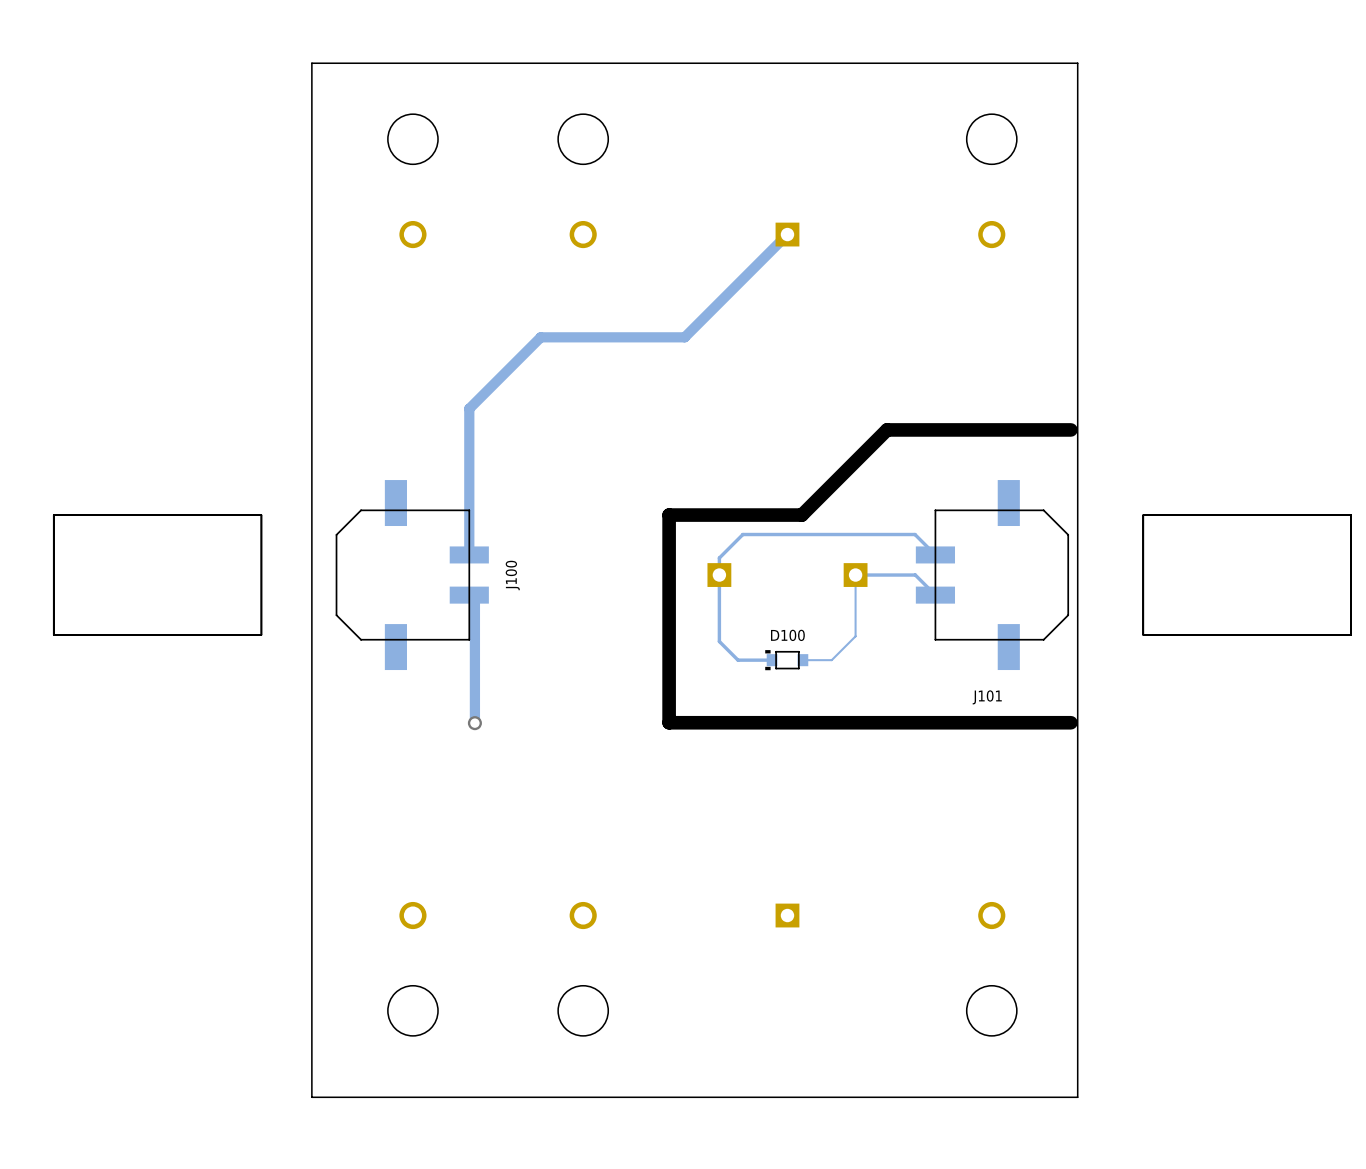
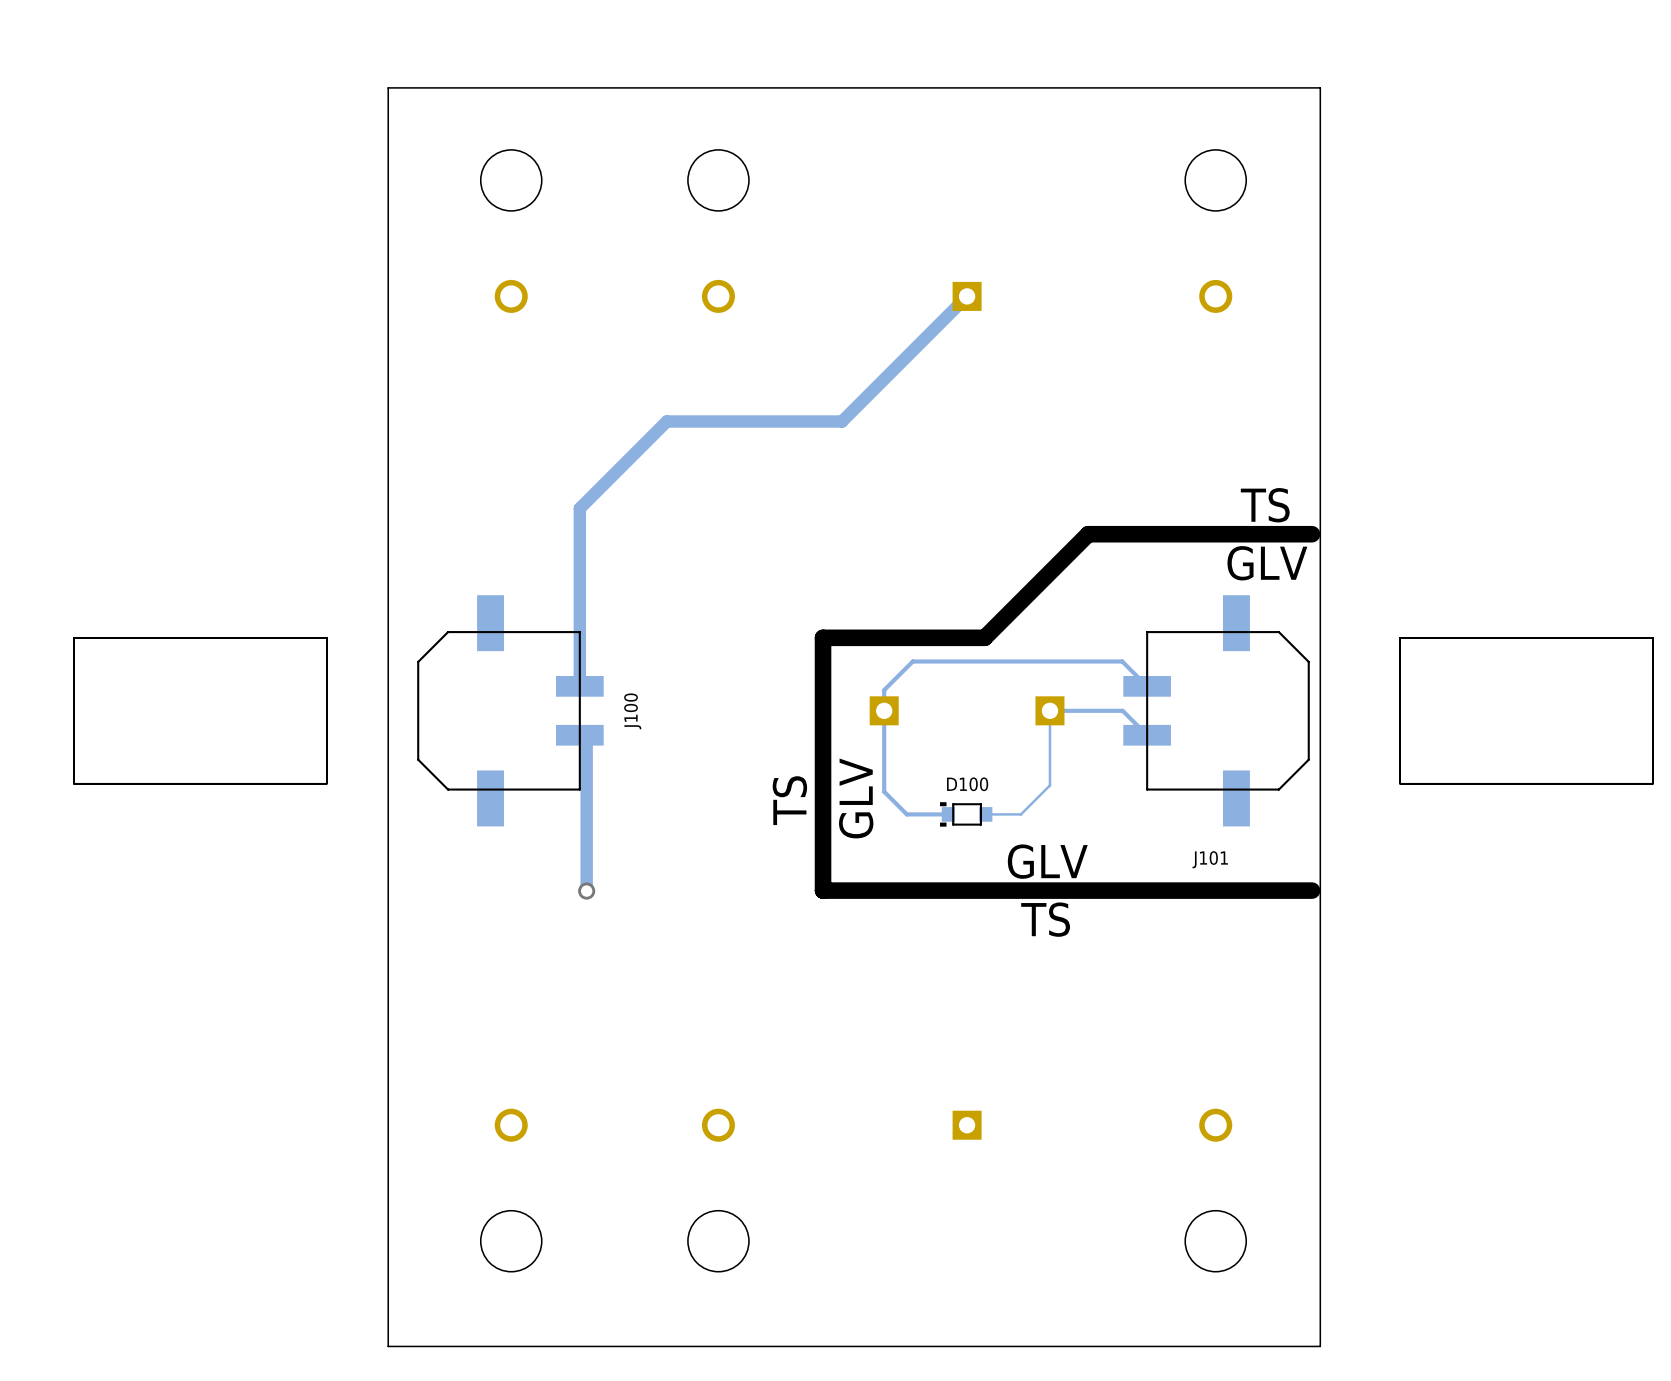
drawing: none -> [1227, 488, 1308, 581]
drawing: none -> [772, 758, 874, 839]
drawing: none -> [1007, 844, 1088, 937]

